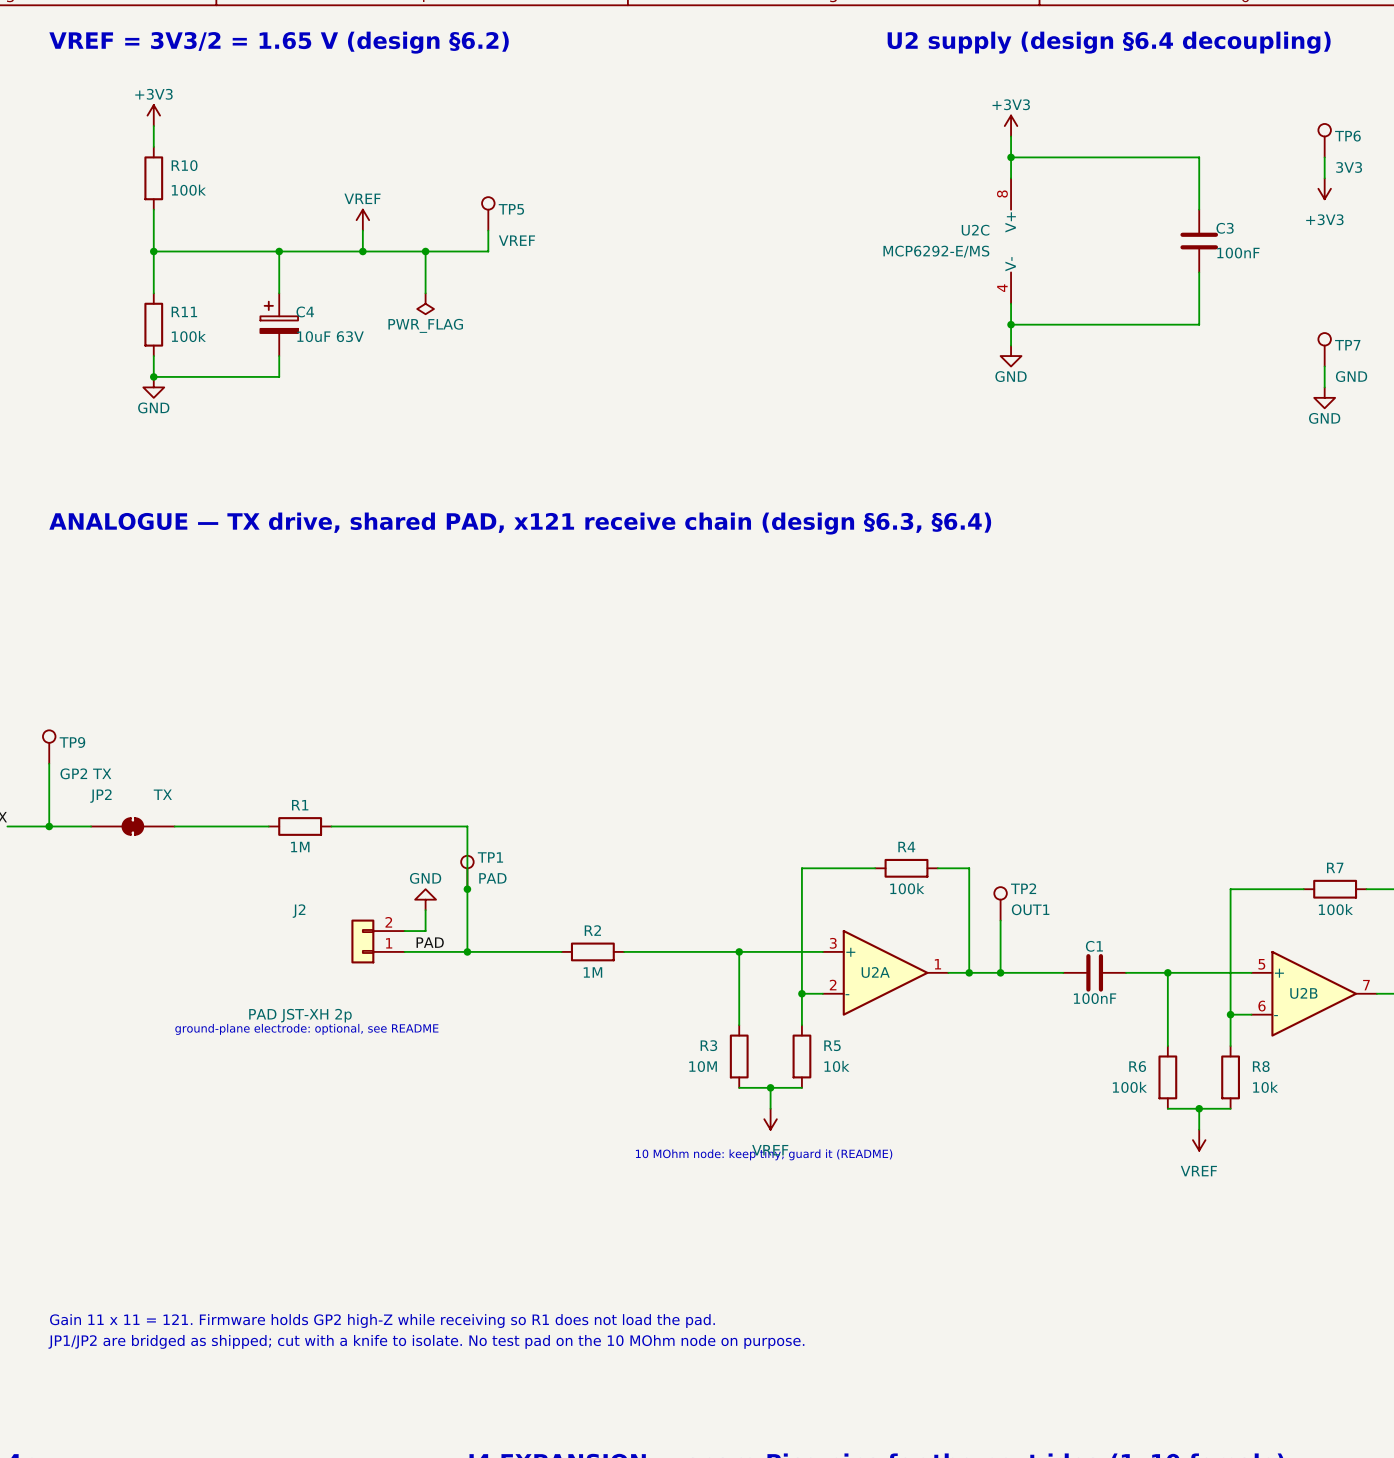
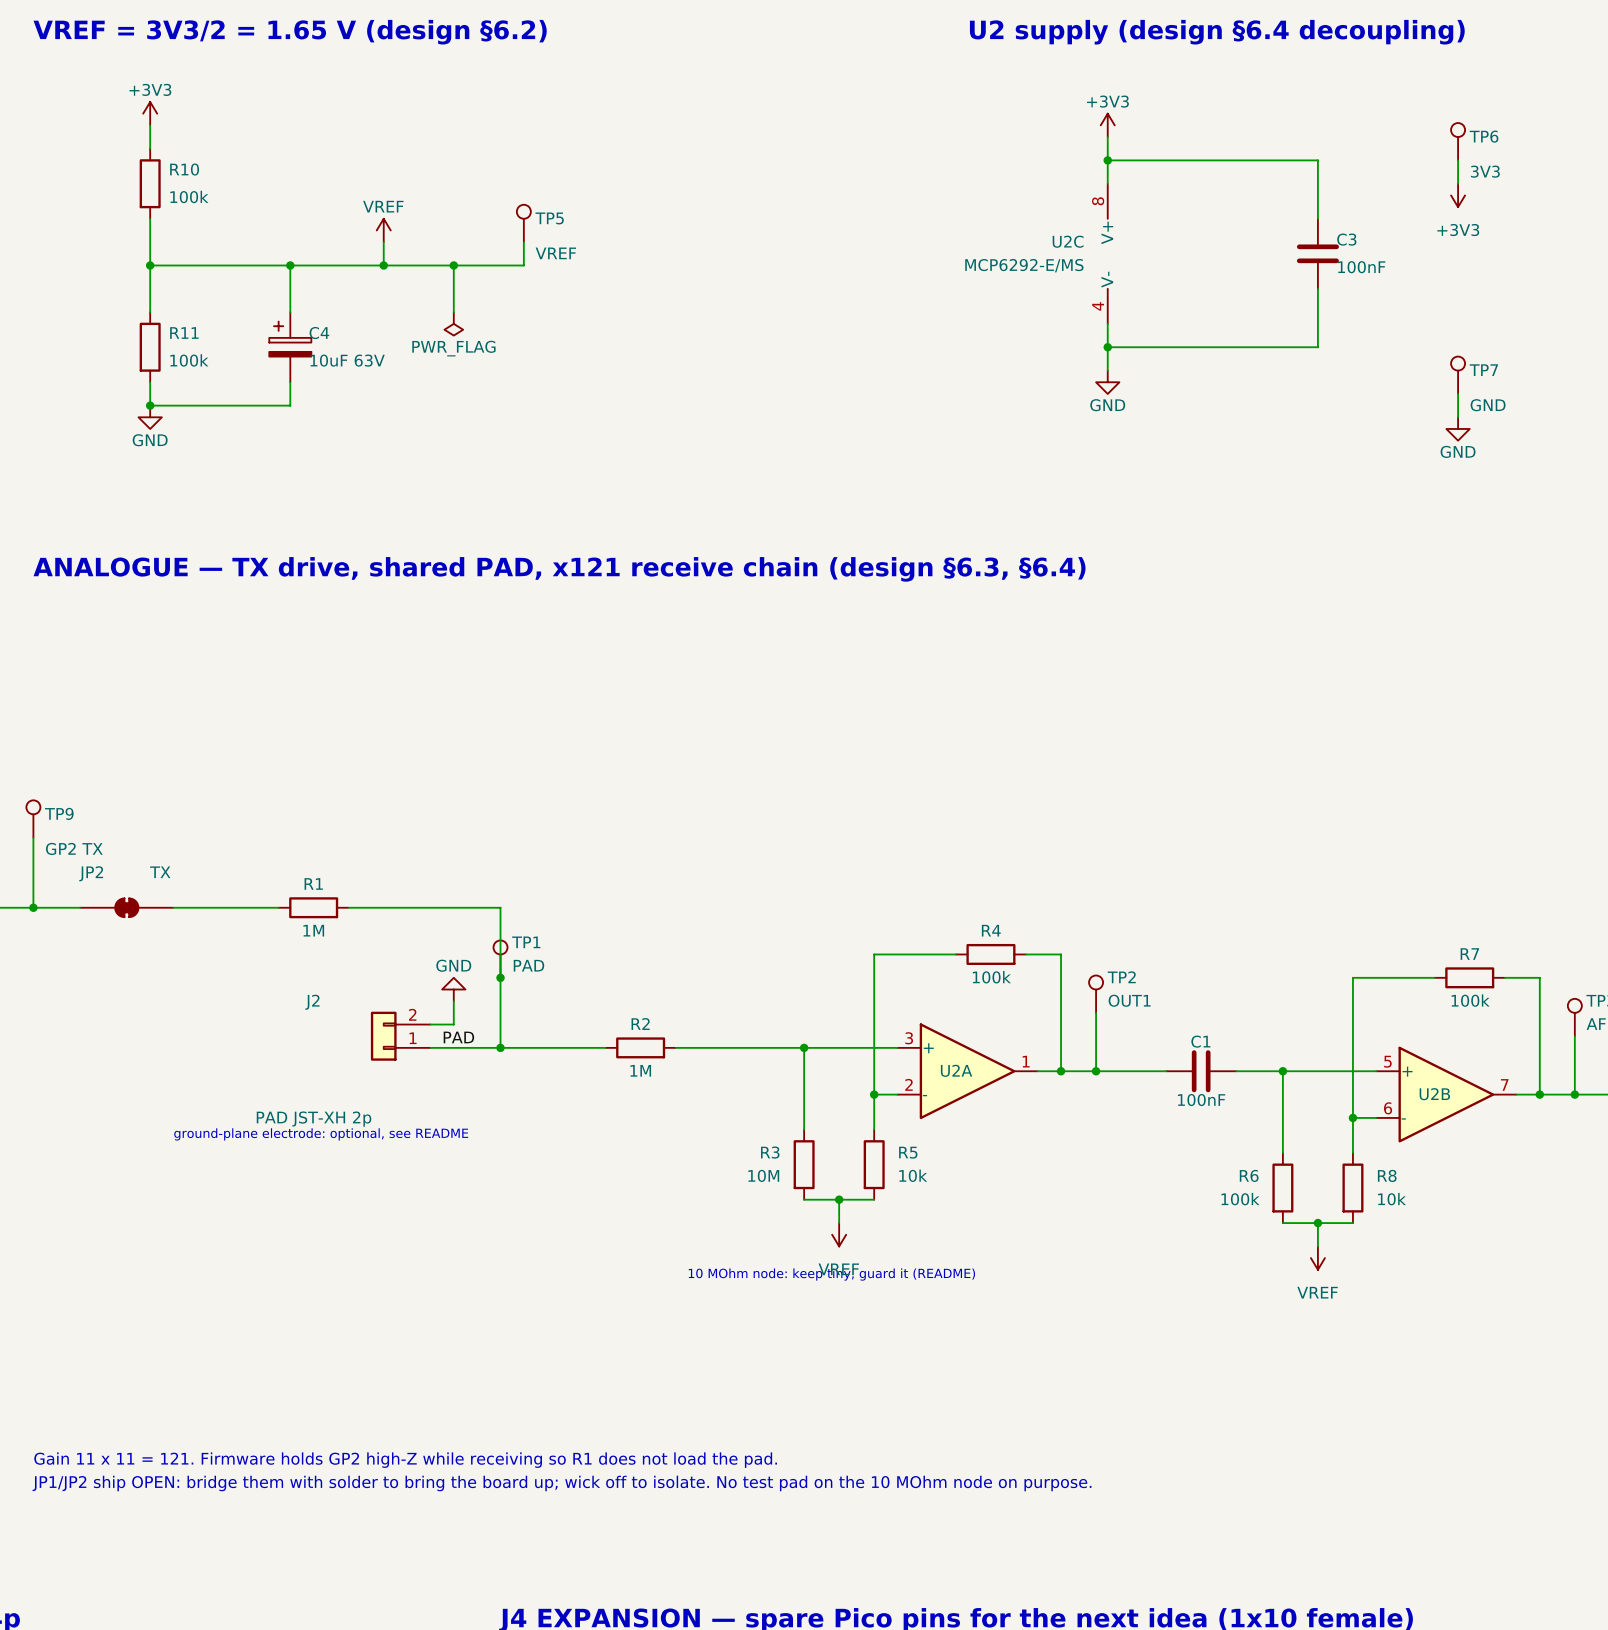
text: JP1/JP2 are bridged as shipped; cut with a knife to isolate. No test pad on the 10 MOhm node on purpose. (426, 1341) -> JP1/JP2 ship OPEN: bridge them with solder to bring the board up; wick off to isolate. No test pad on the 10 MOhm node on purpose. (562, 1483)

